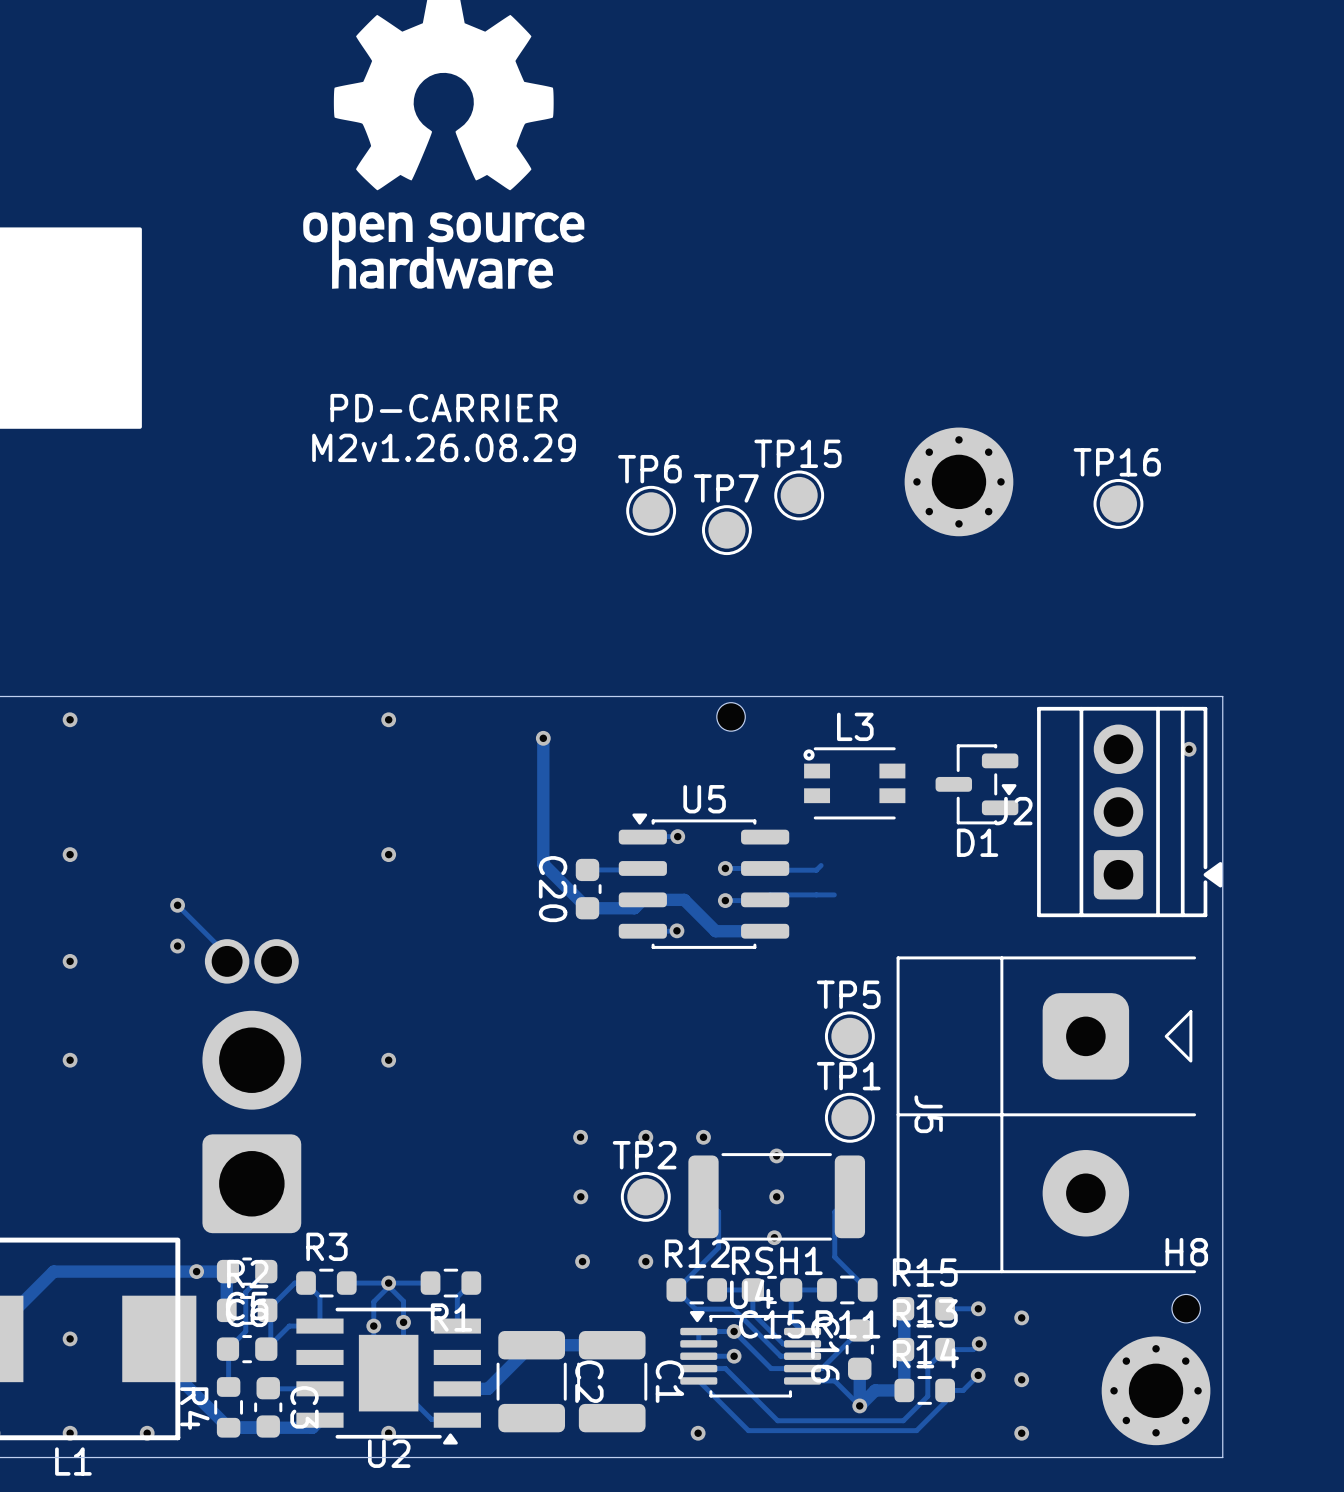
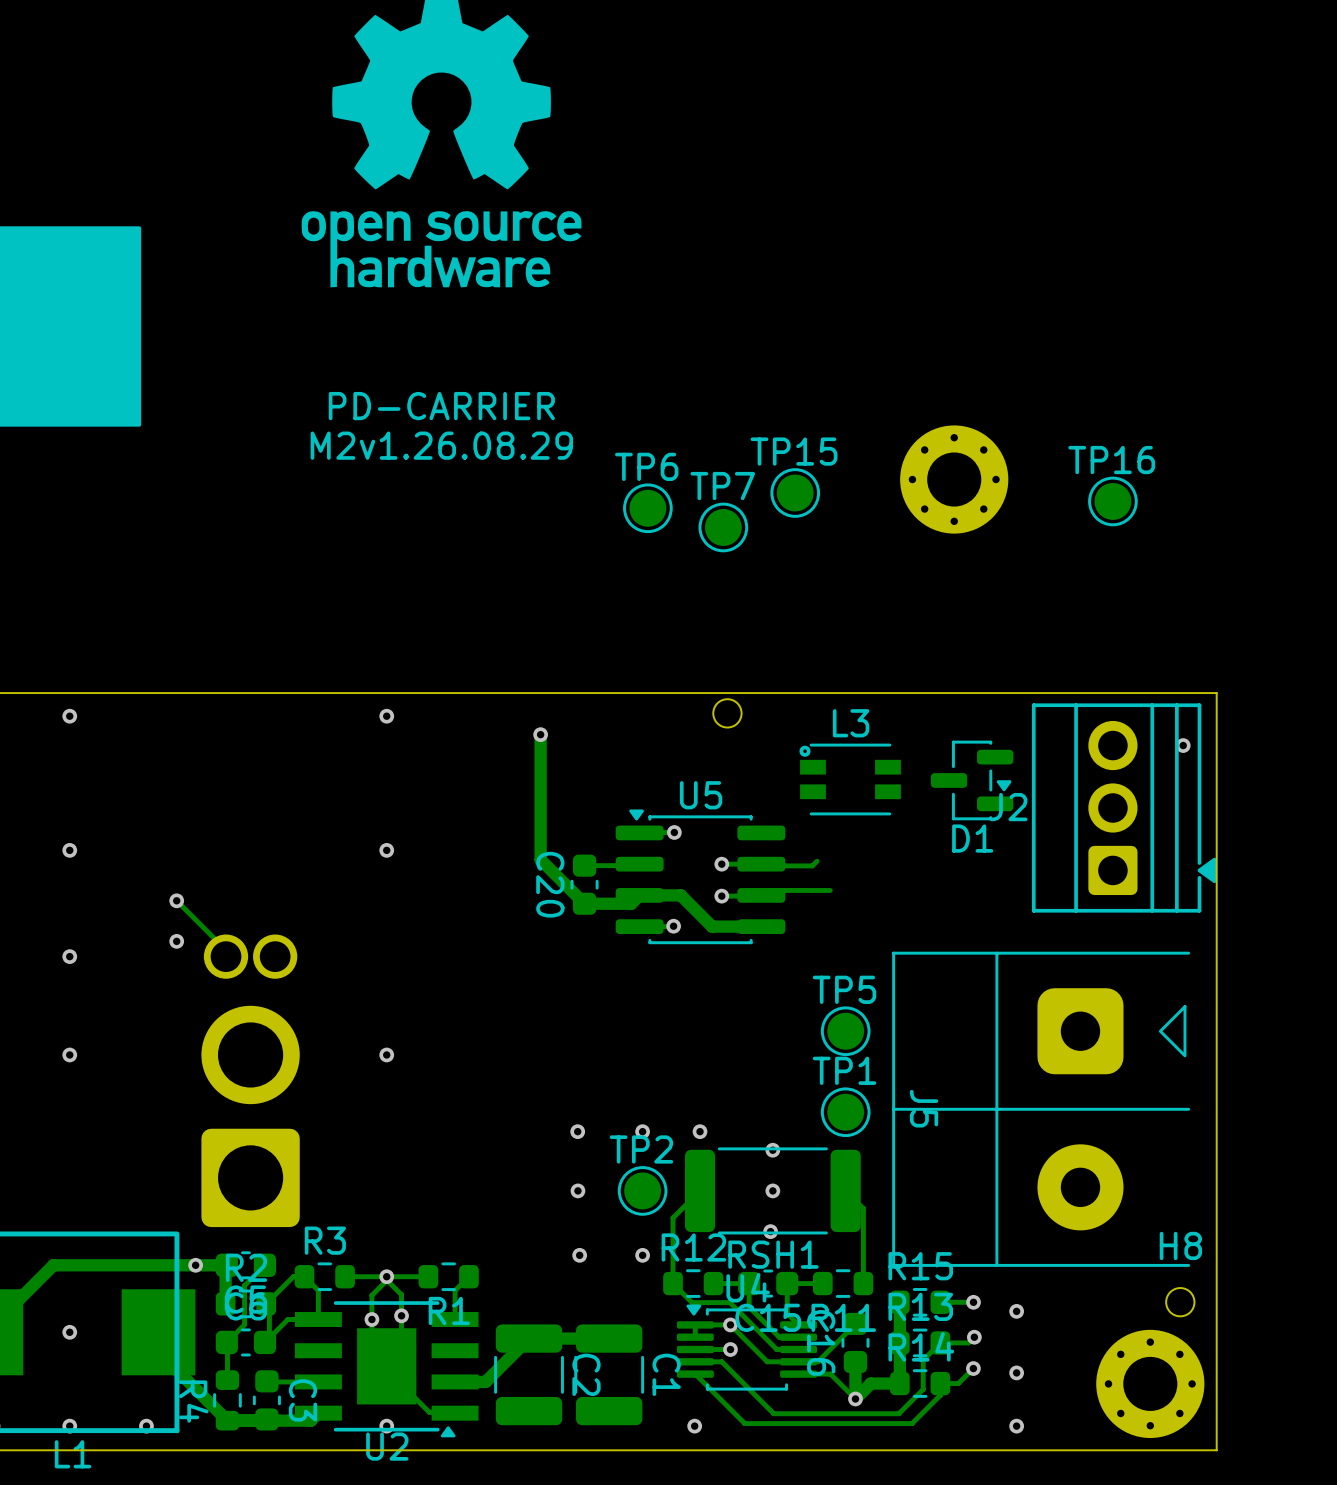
track: (703, 1196) (718, 1211) (718, 1247) (676, 1289) -> (700, 1190) (673, 1217) (673, 1283)
track: (849, 1196) (834, 1211) (834, 1257) (867, 1289) -> (845, 1190) (863, 1208) (863, 1283)

